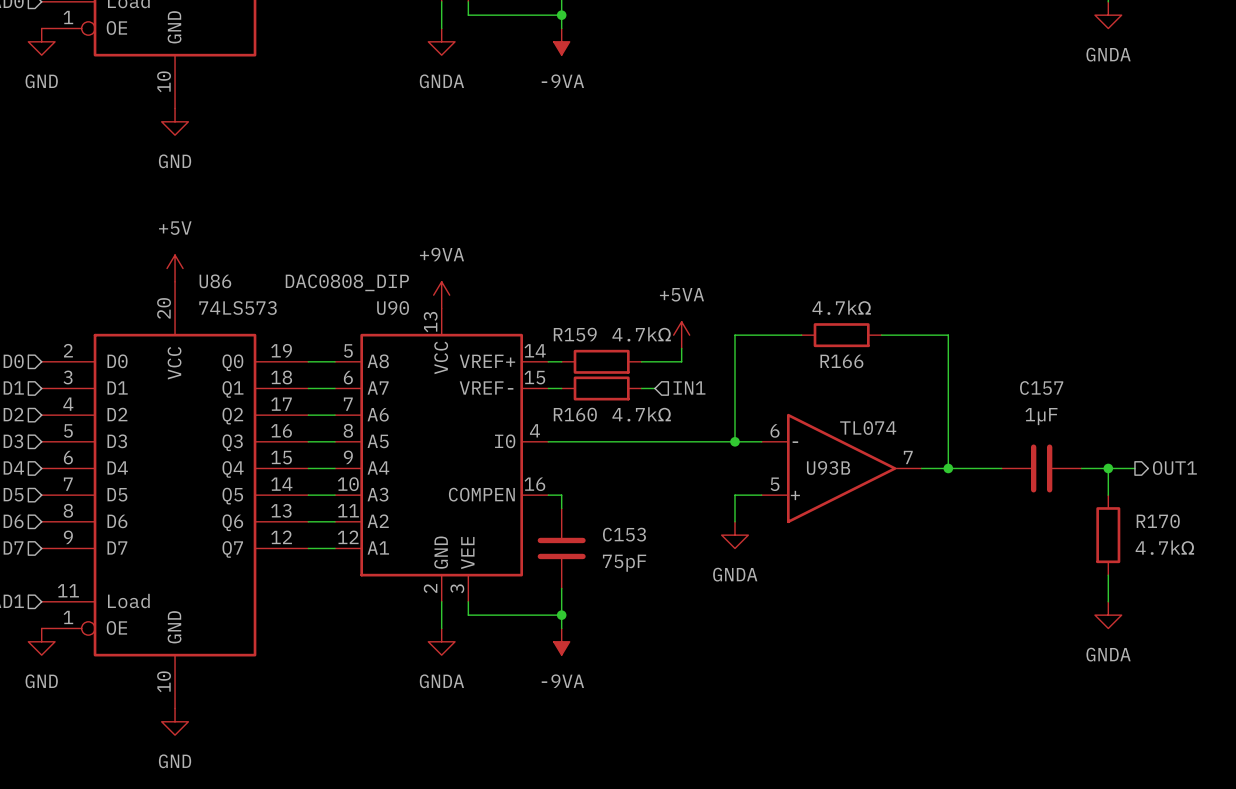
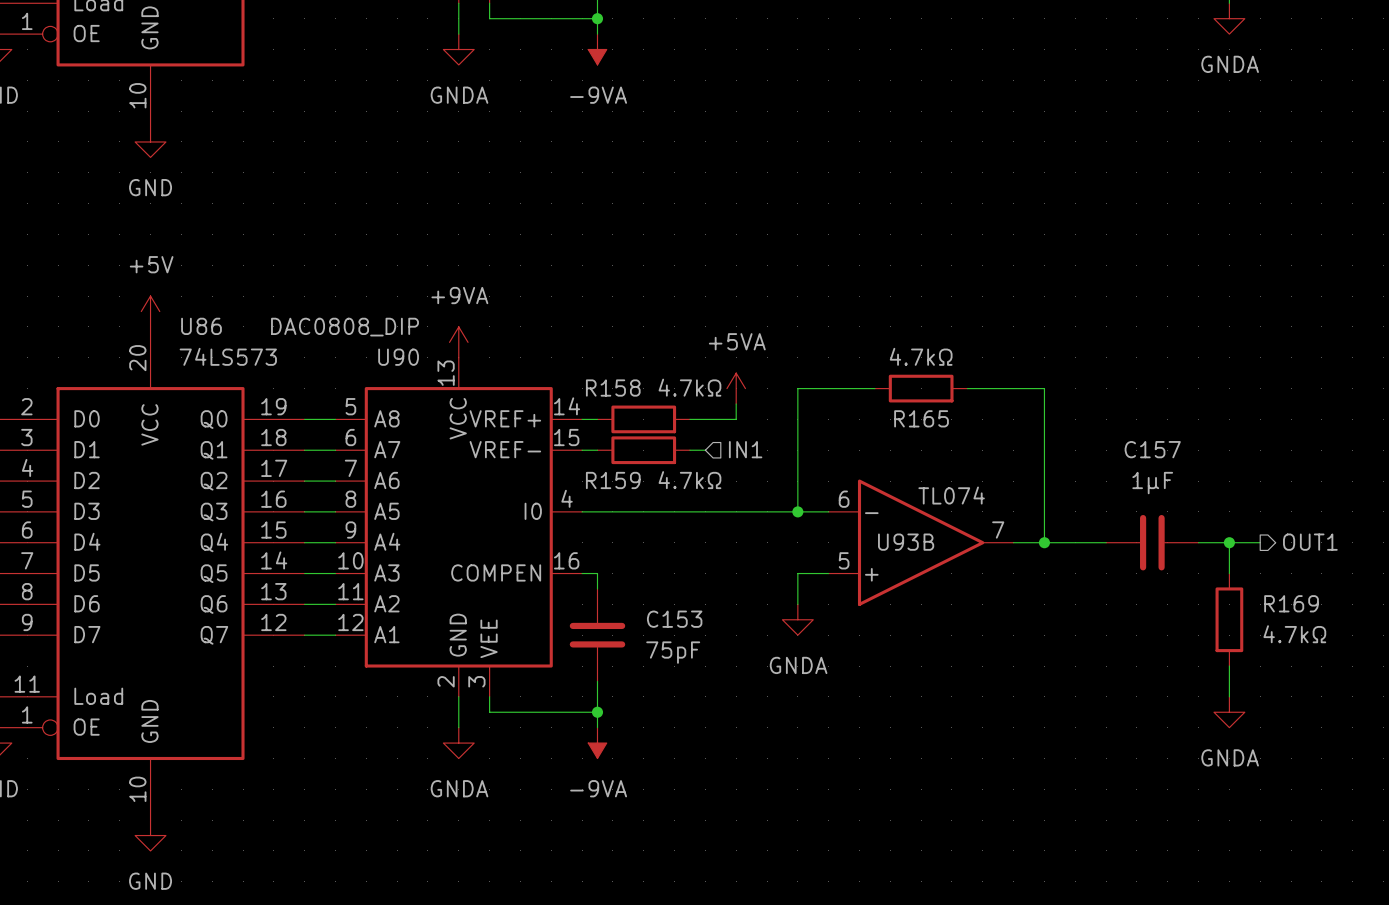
R159 name: R159 (575, 334) -> R158 (613, 388)
R166 name: R166 (841, 361) -> R165 (921, 418)
R160 name: R160 (575, 414) -> R159 (613, 480)
R170 name: R170 (1158, 521) -> R169 (1291, 603)

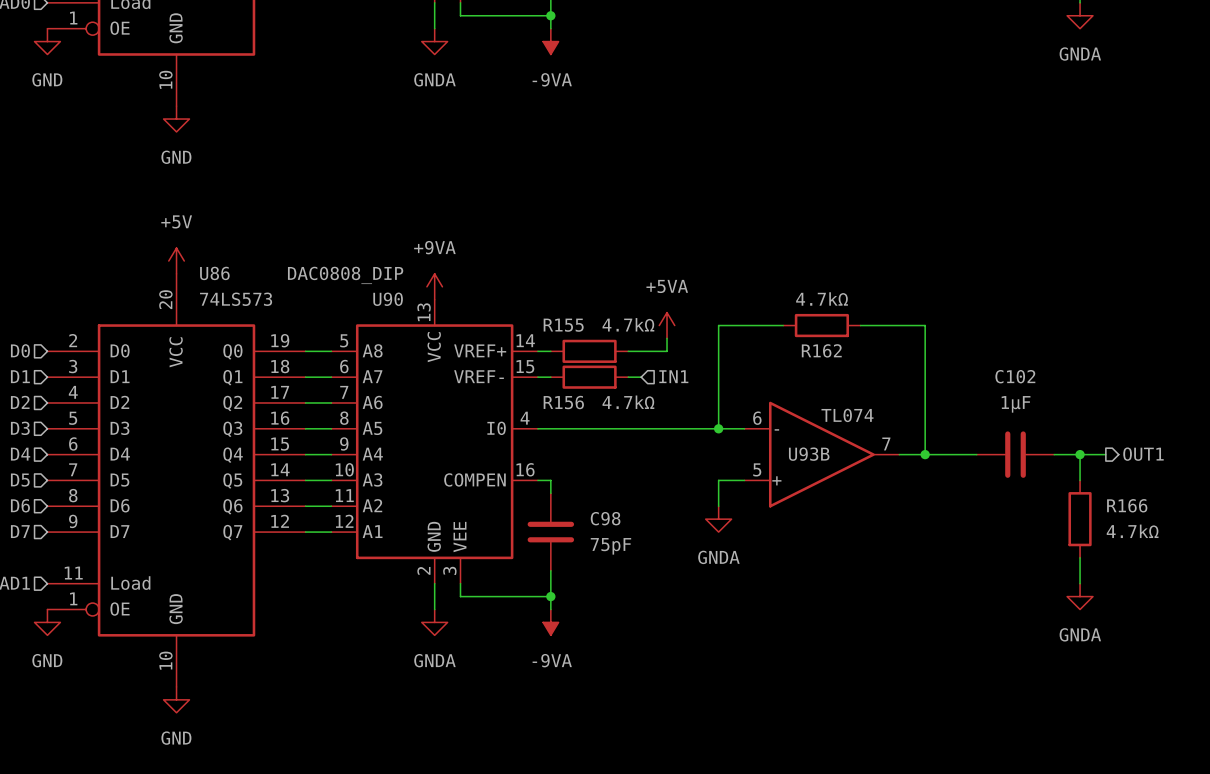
R158 name: R158 (613, 388) -> R155 (563, 325)
R165 name: R165 (921, 418) -> R162 (821, 350)
C157 name: C157 (1152, 449) -> C102 (1015, 376)
R159 name: R159 (613, 480) -> R156 (563, 402)
R169 name: R169 (1291, 603) -> R166 (1127, 505)
C153 name: C153 (674, 619) -> C98 (605, 518)

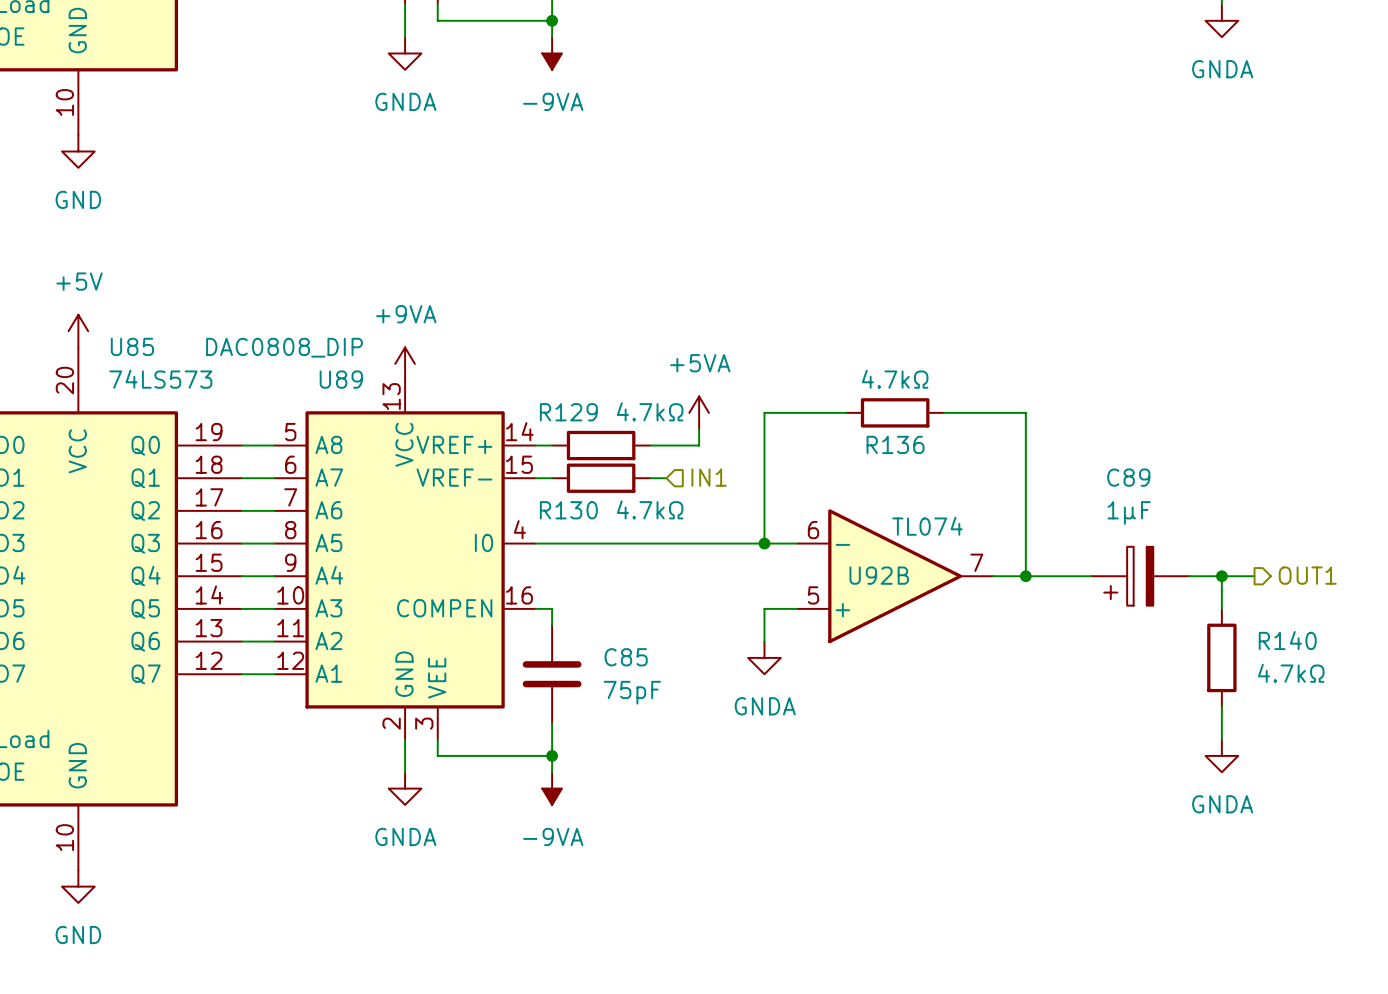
U86 name: U86 (214, 273) -> U85 (132, 346)
U90 name: U90 (388, 299) -> U89 (341, 379)
R155 name: R155 (563, 325) -> R129 (568, 412)
R162 name: R162 (821, 350) -> R136 (895, 444)
R156 name: R156 (563, 402) -> R130 (568, 510)
U93B name: U93B (809, 454) -> U92B (879, 575)
C102: 1µF (1015, 454) -> none
C89: none -> 1μF (1140, 576)
R166 name: R166 (1127, 505) -> R140 (1287, 640)
C98 name: C98 (605, 518) -> C85 (626, 657)

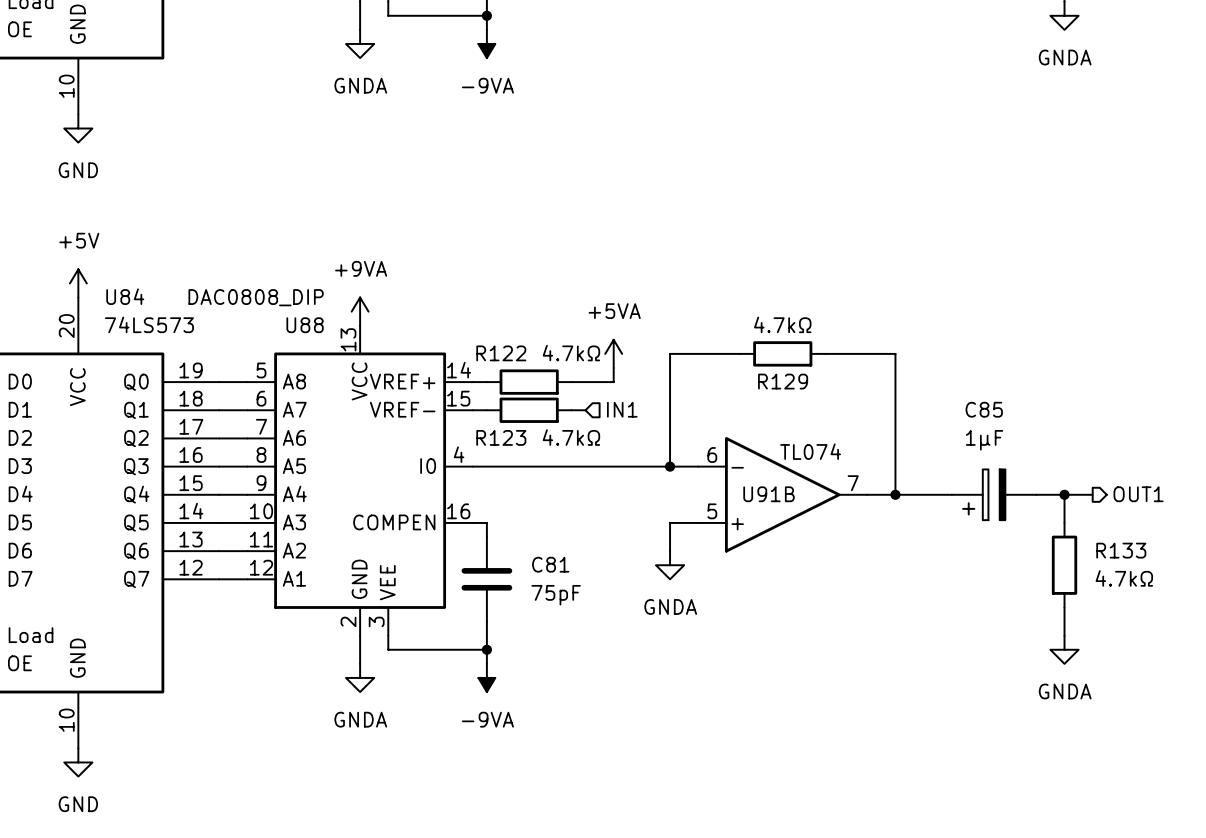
U85 name: U85 (132, 346) -> U84 (125, 296)
U89 name: U89 (341, 379) -> U88 (305, 325)
R129 name: R129 (568, 412) -> R122 (501, 353)
R136 name: R136 (895, 444) -> R129 (783, 381)
C89 name: C89 (1128, 477) -> C85 (984, 409)
R130 name: R130 (568, 510) -> R123 (501, 437)
U92B name: U92B (879, 575) -> U91B (769, 494)
R140 name: R140 (1287, 640) -> R133 (1121, 550)
C85 name: C85 (626, 657) -> C81 (550, 564)

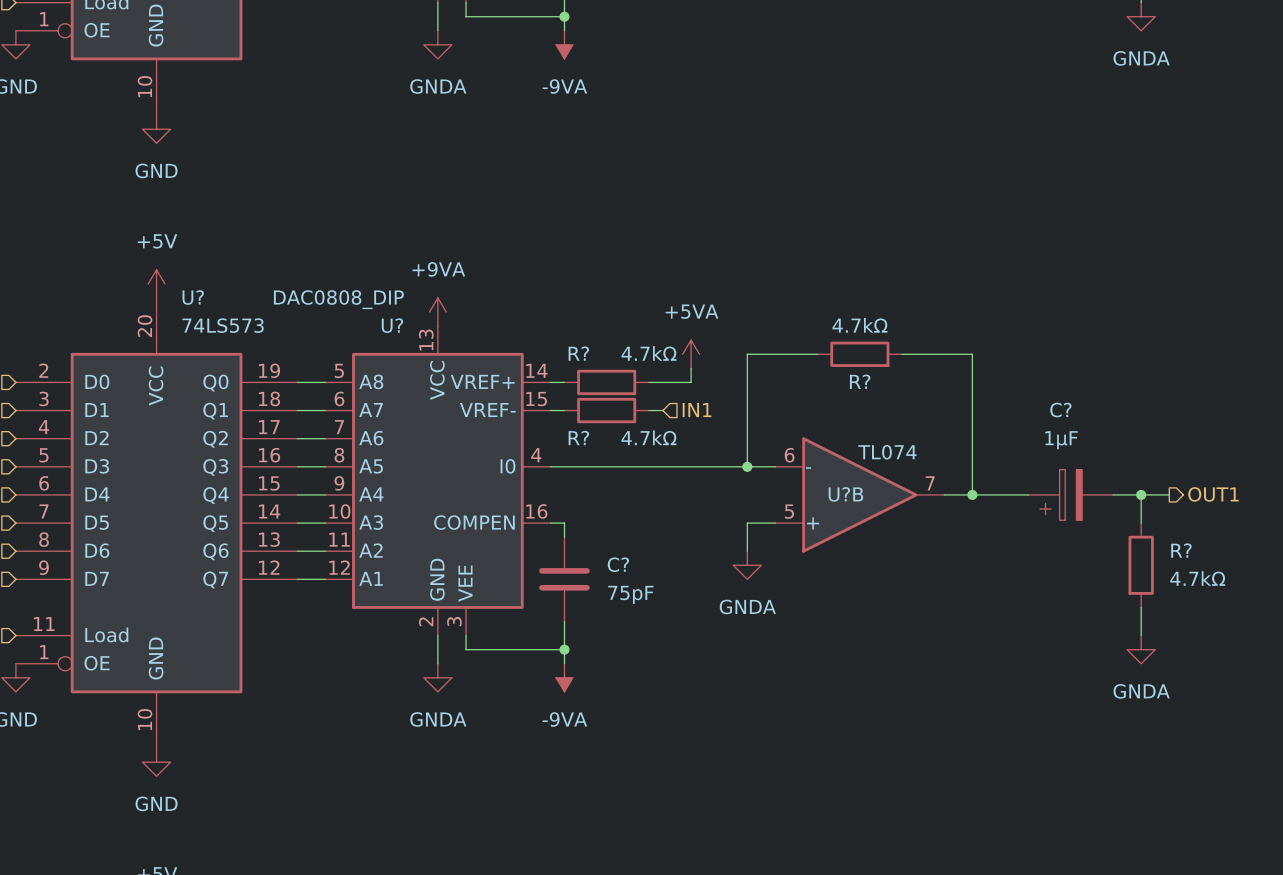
U84 name: U84 (125, 296) -> U? (193, 297)
U88 name: U88 (305, 325) -> U? (392, 325)
R122 name: R122 (501, 353) -> R? (578, 353)
R129 name: R129 (783, 381) -> R? (860, 381)
C85 name: C85 (984, 409) -> C? (1060, 410)
R123 name: R123 (501, 437) -> R? (578, 438)
U91B name: U91B (769, 494) -> U?B (845, 494)
R133 name: R133 (1121, 550) -> R? (1181, 550)
C81 name: C81 (550, 564) -> C? (618, 564)

